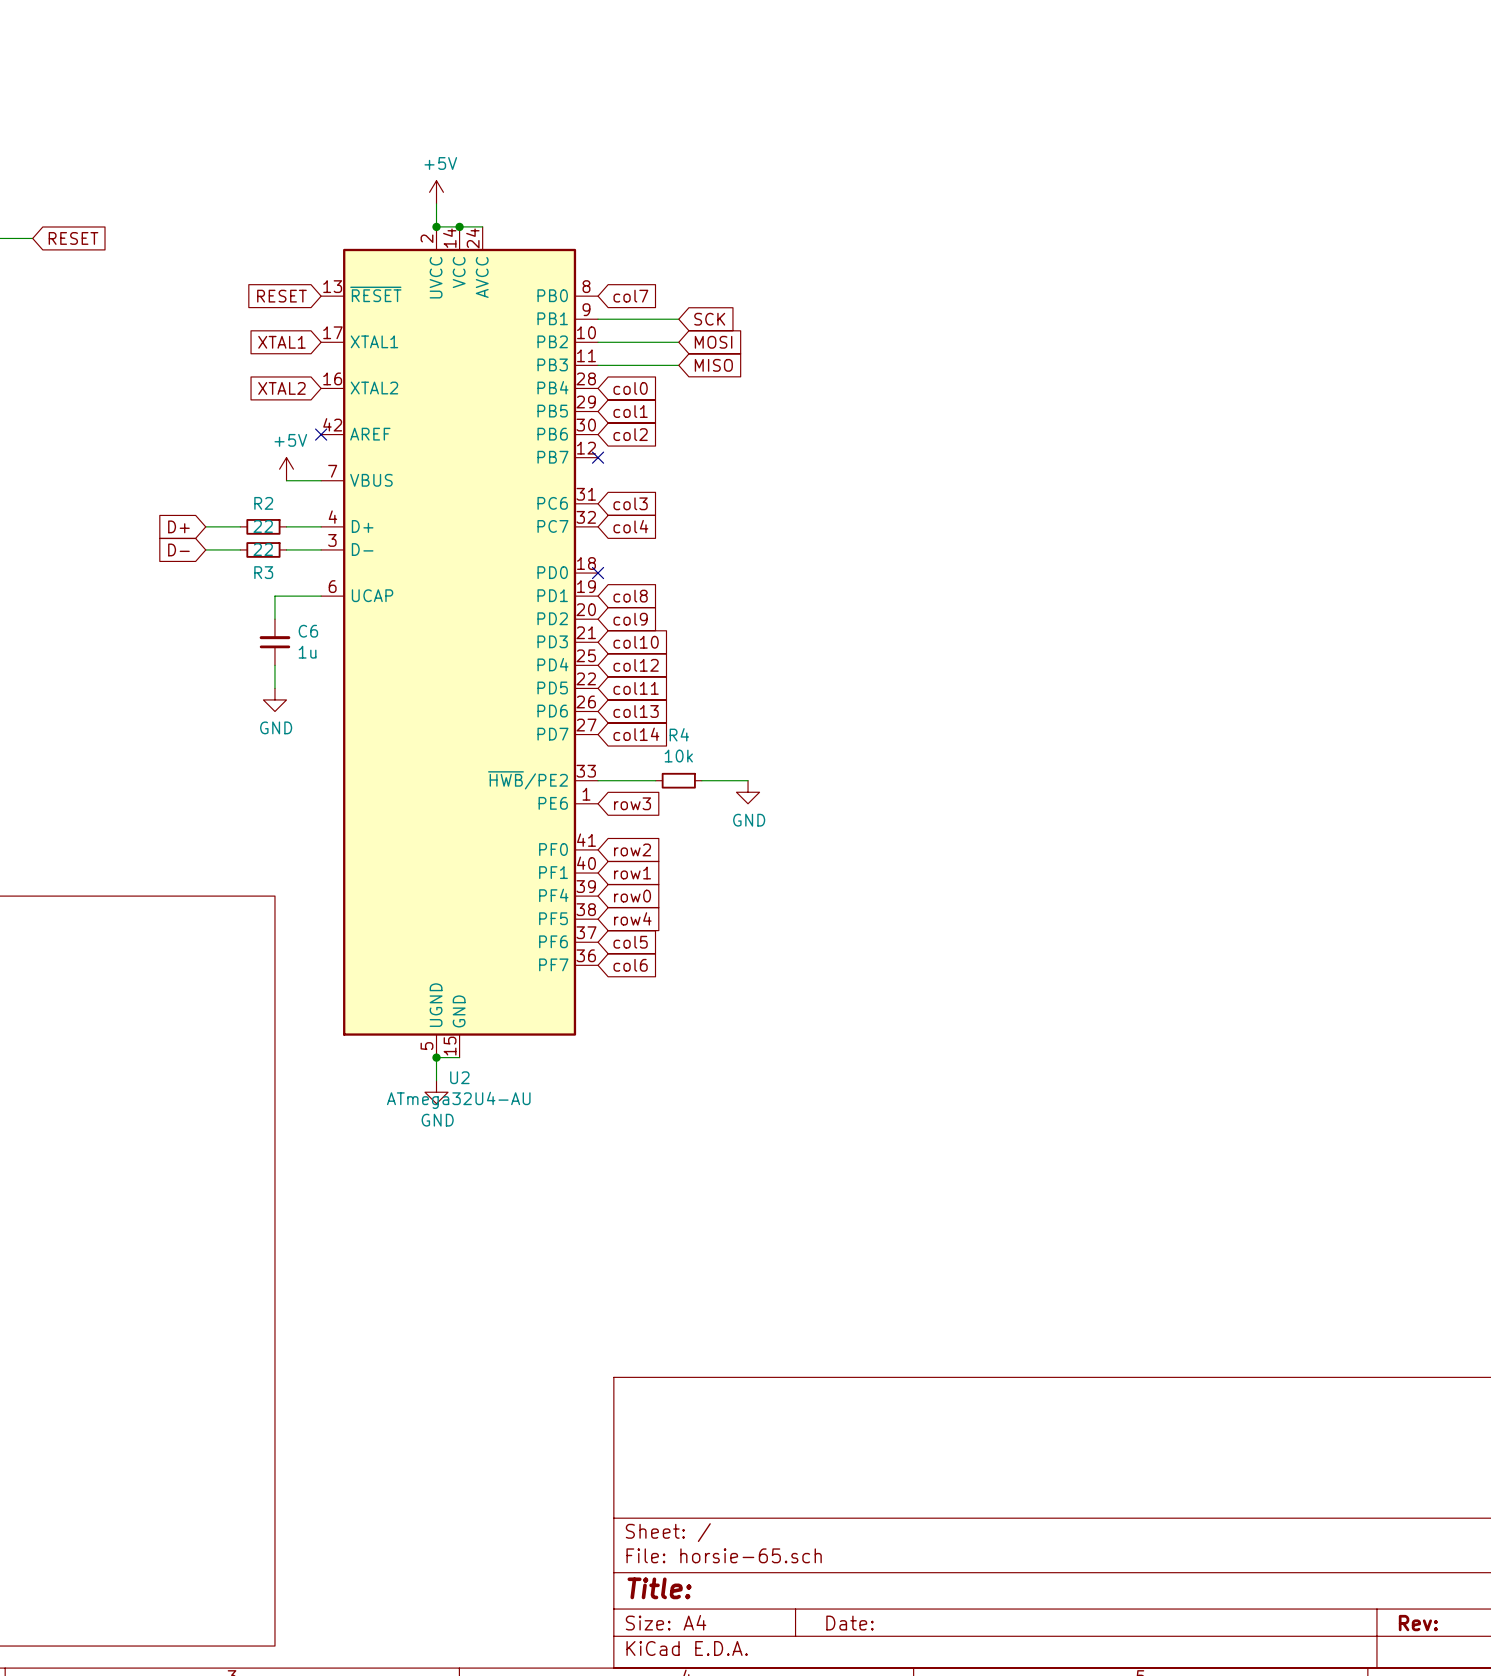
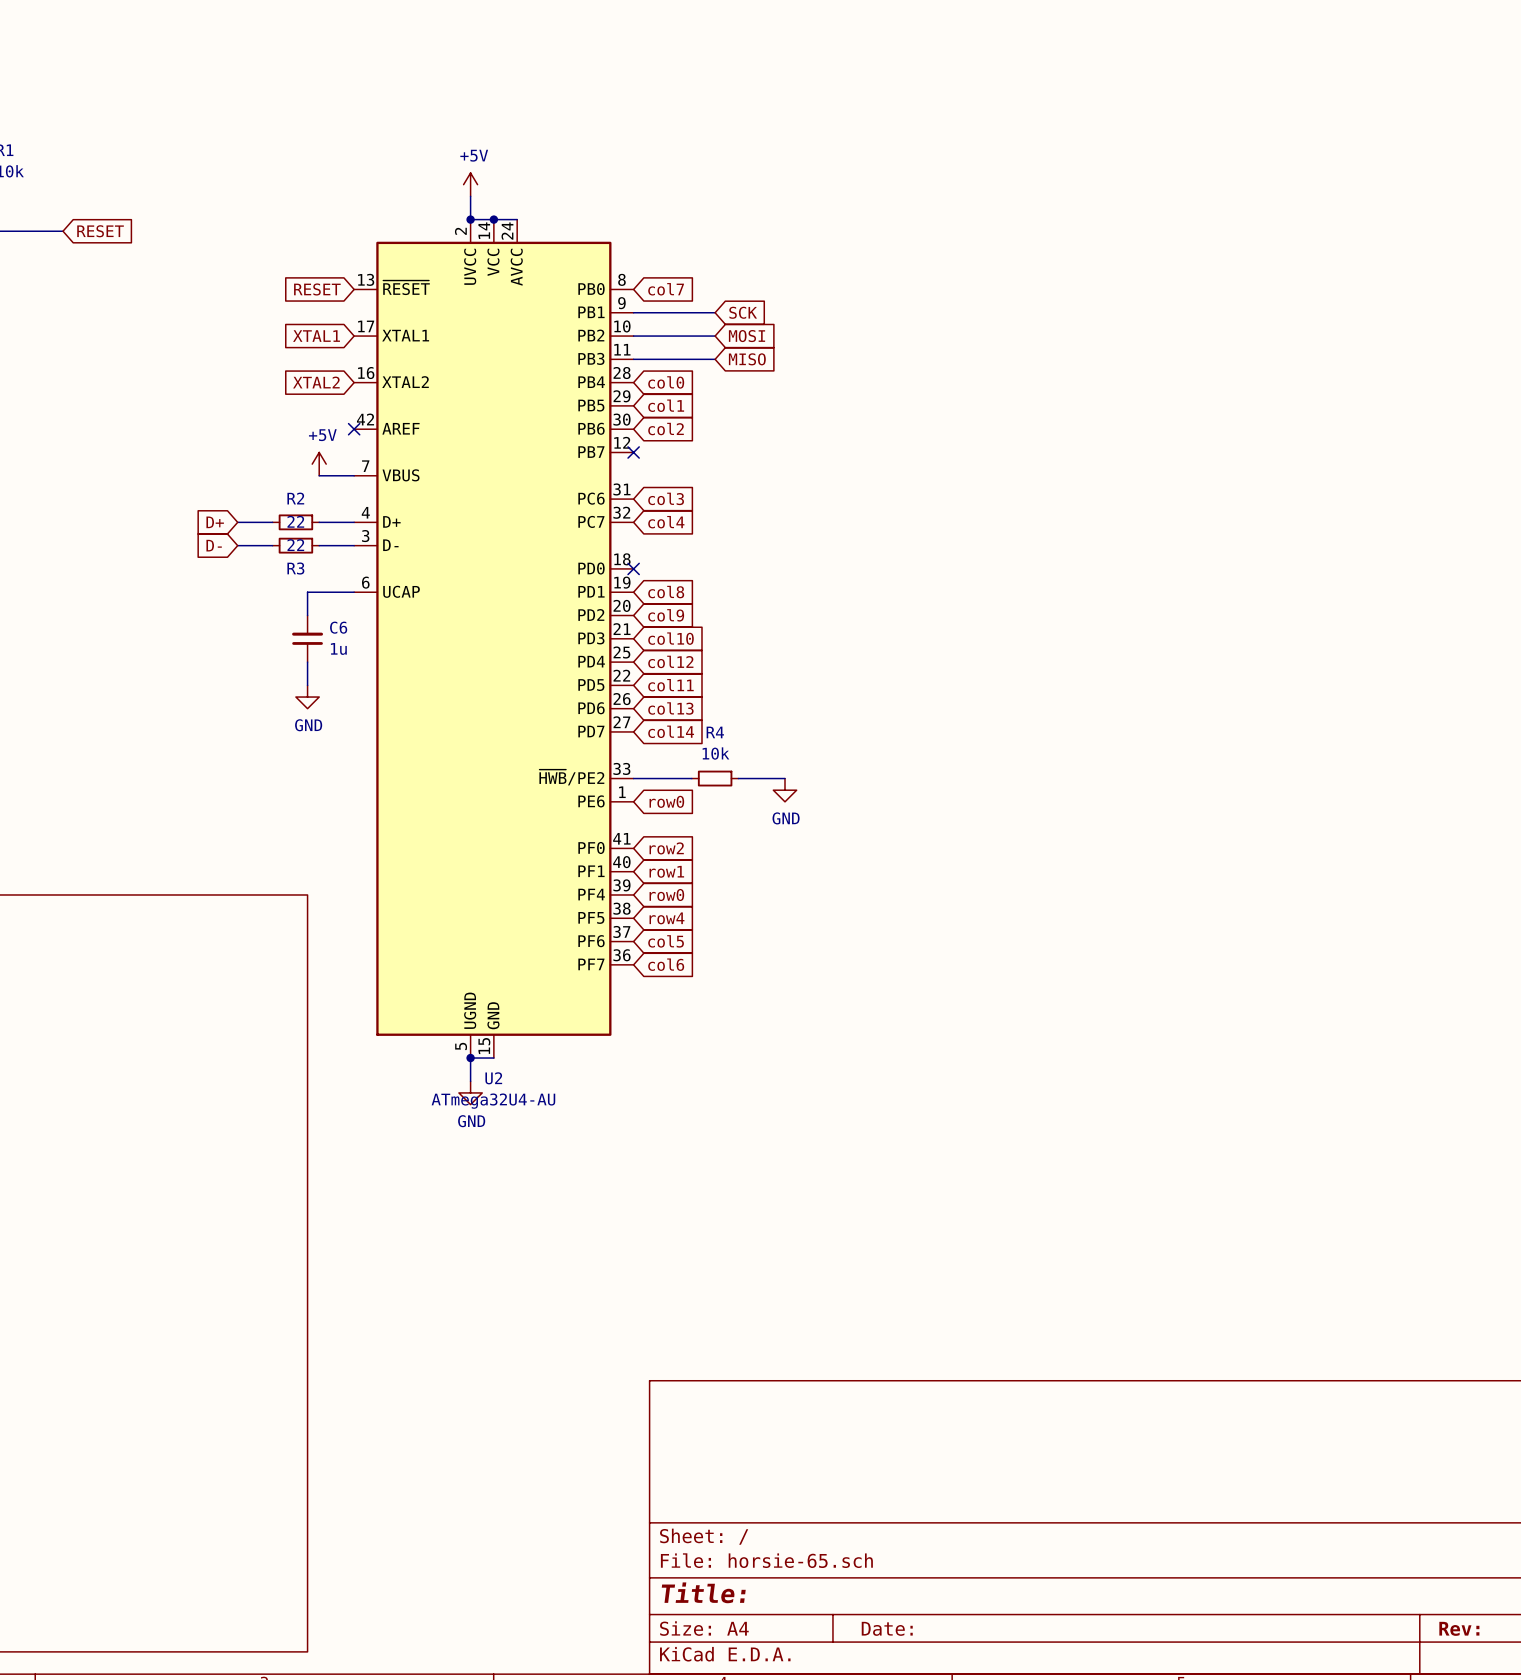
global label: row3 (632, 803) -> row0 (666, 801)

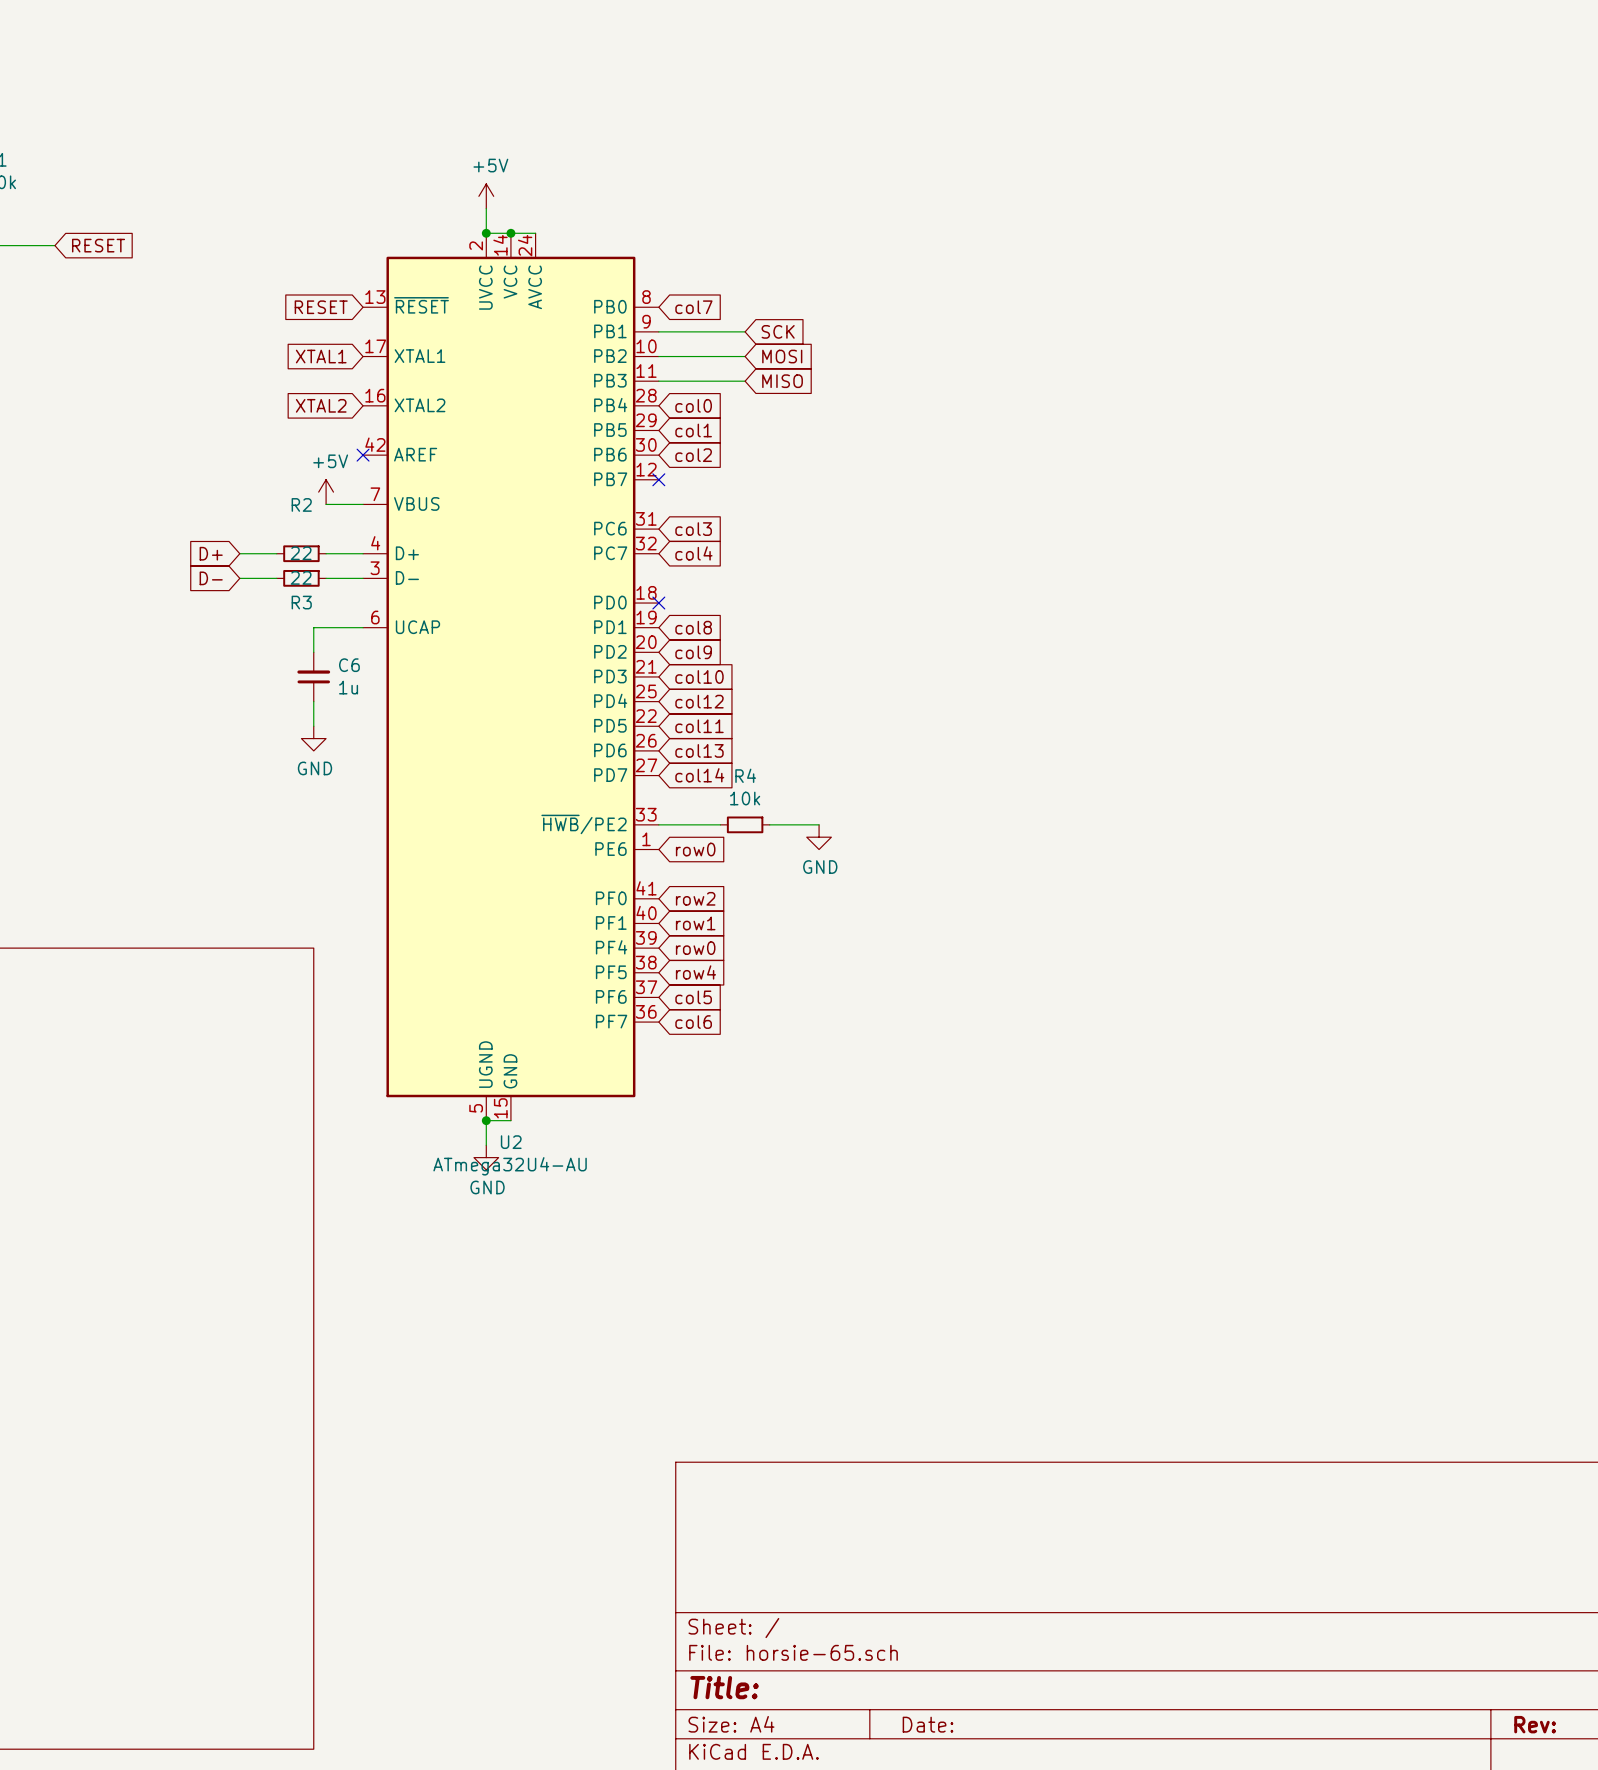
R2 name position: R2 (295, 498) -> R2 (301, 504)

